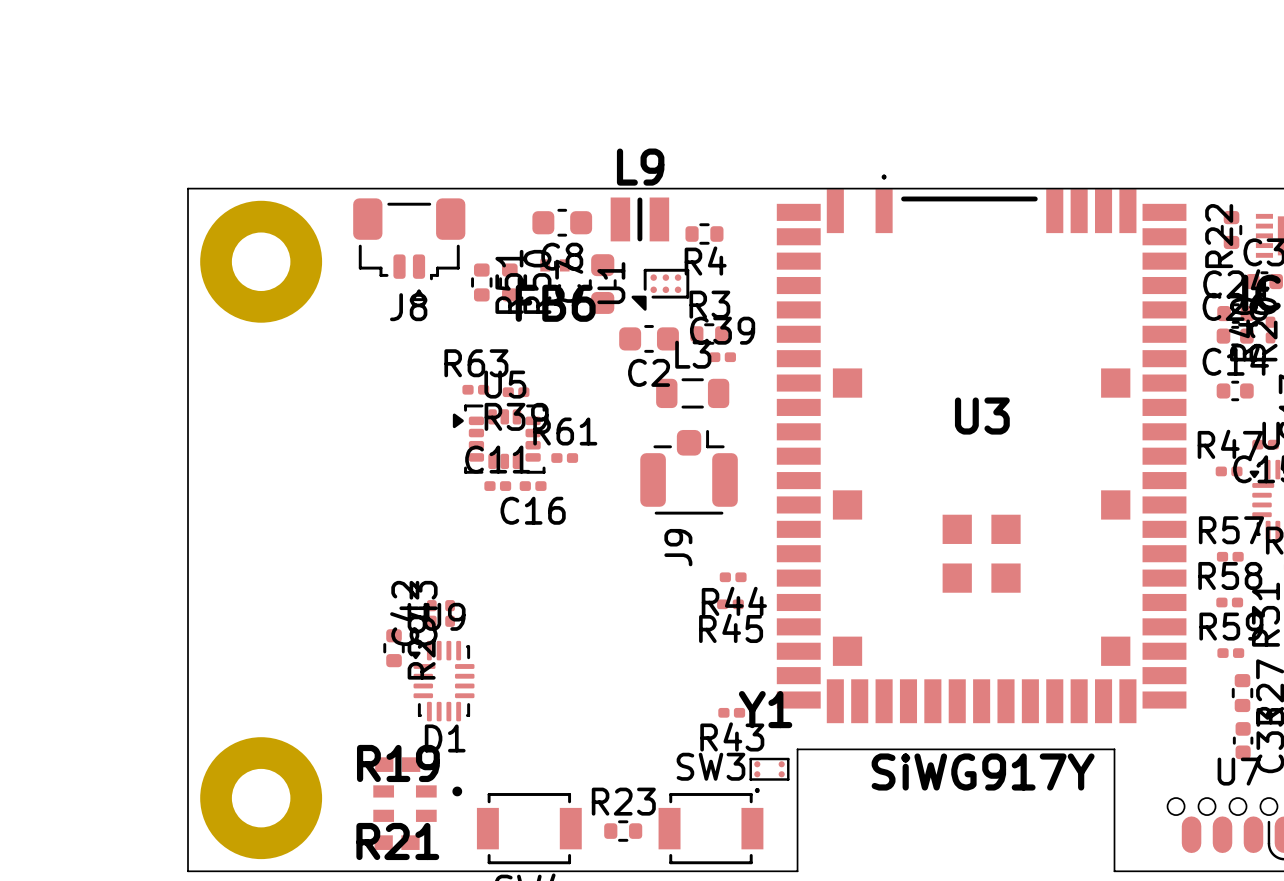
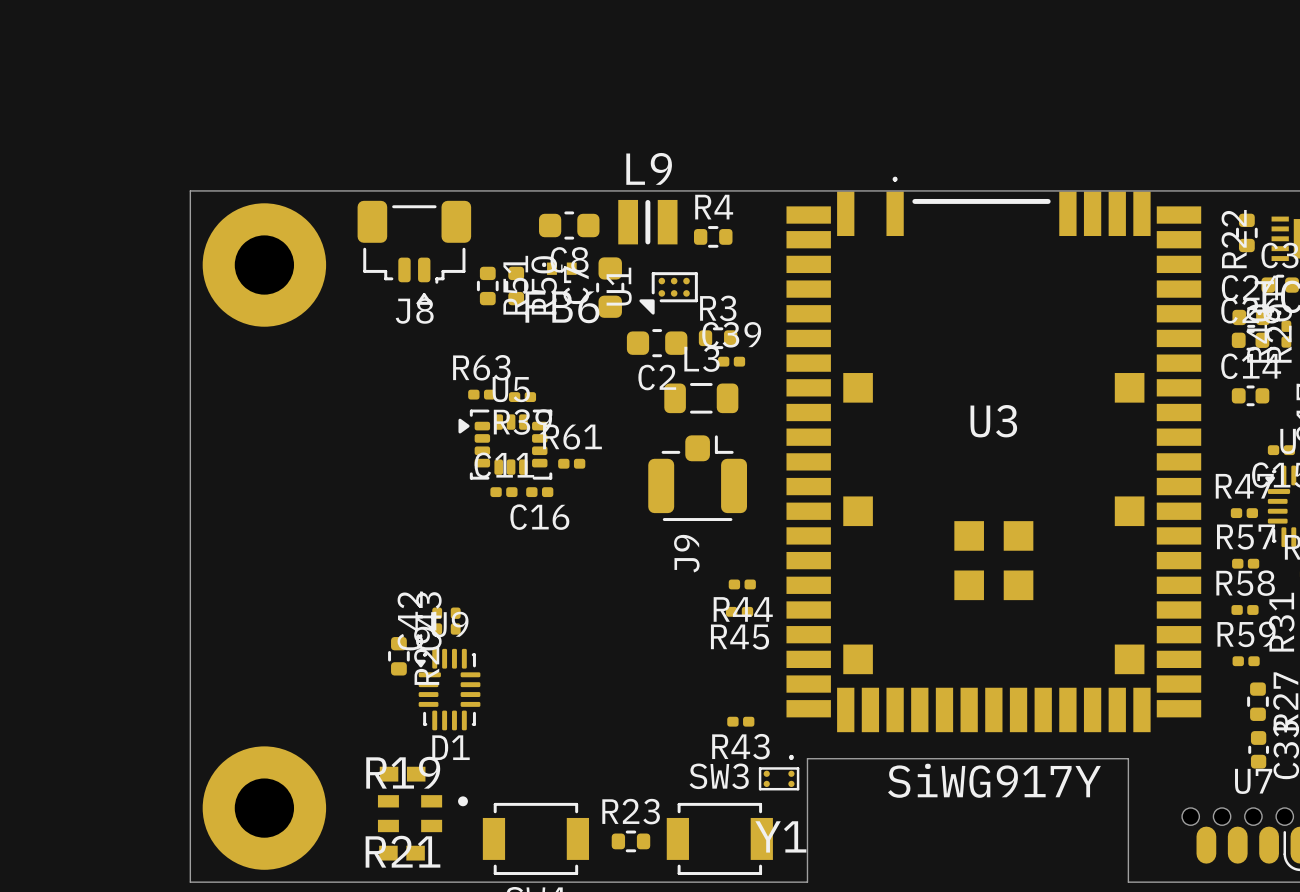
R4 name position: R4 (705, 261) -> R4 (714, 207)
R47 position: (1229, 471) -> (1244, 513)
Y1 rotation: 0° (769, 775) -> 180° (779, 772)

